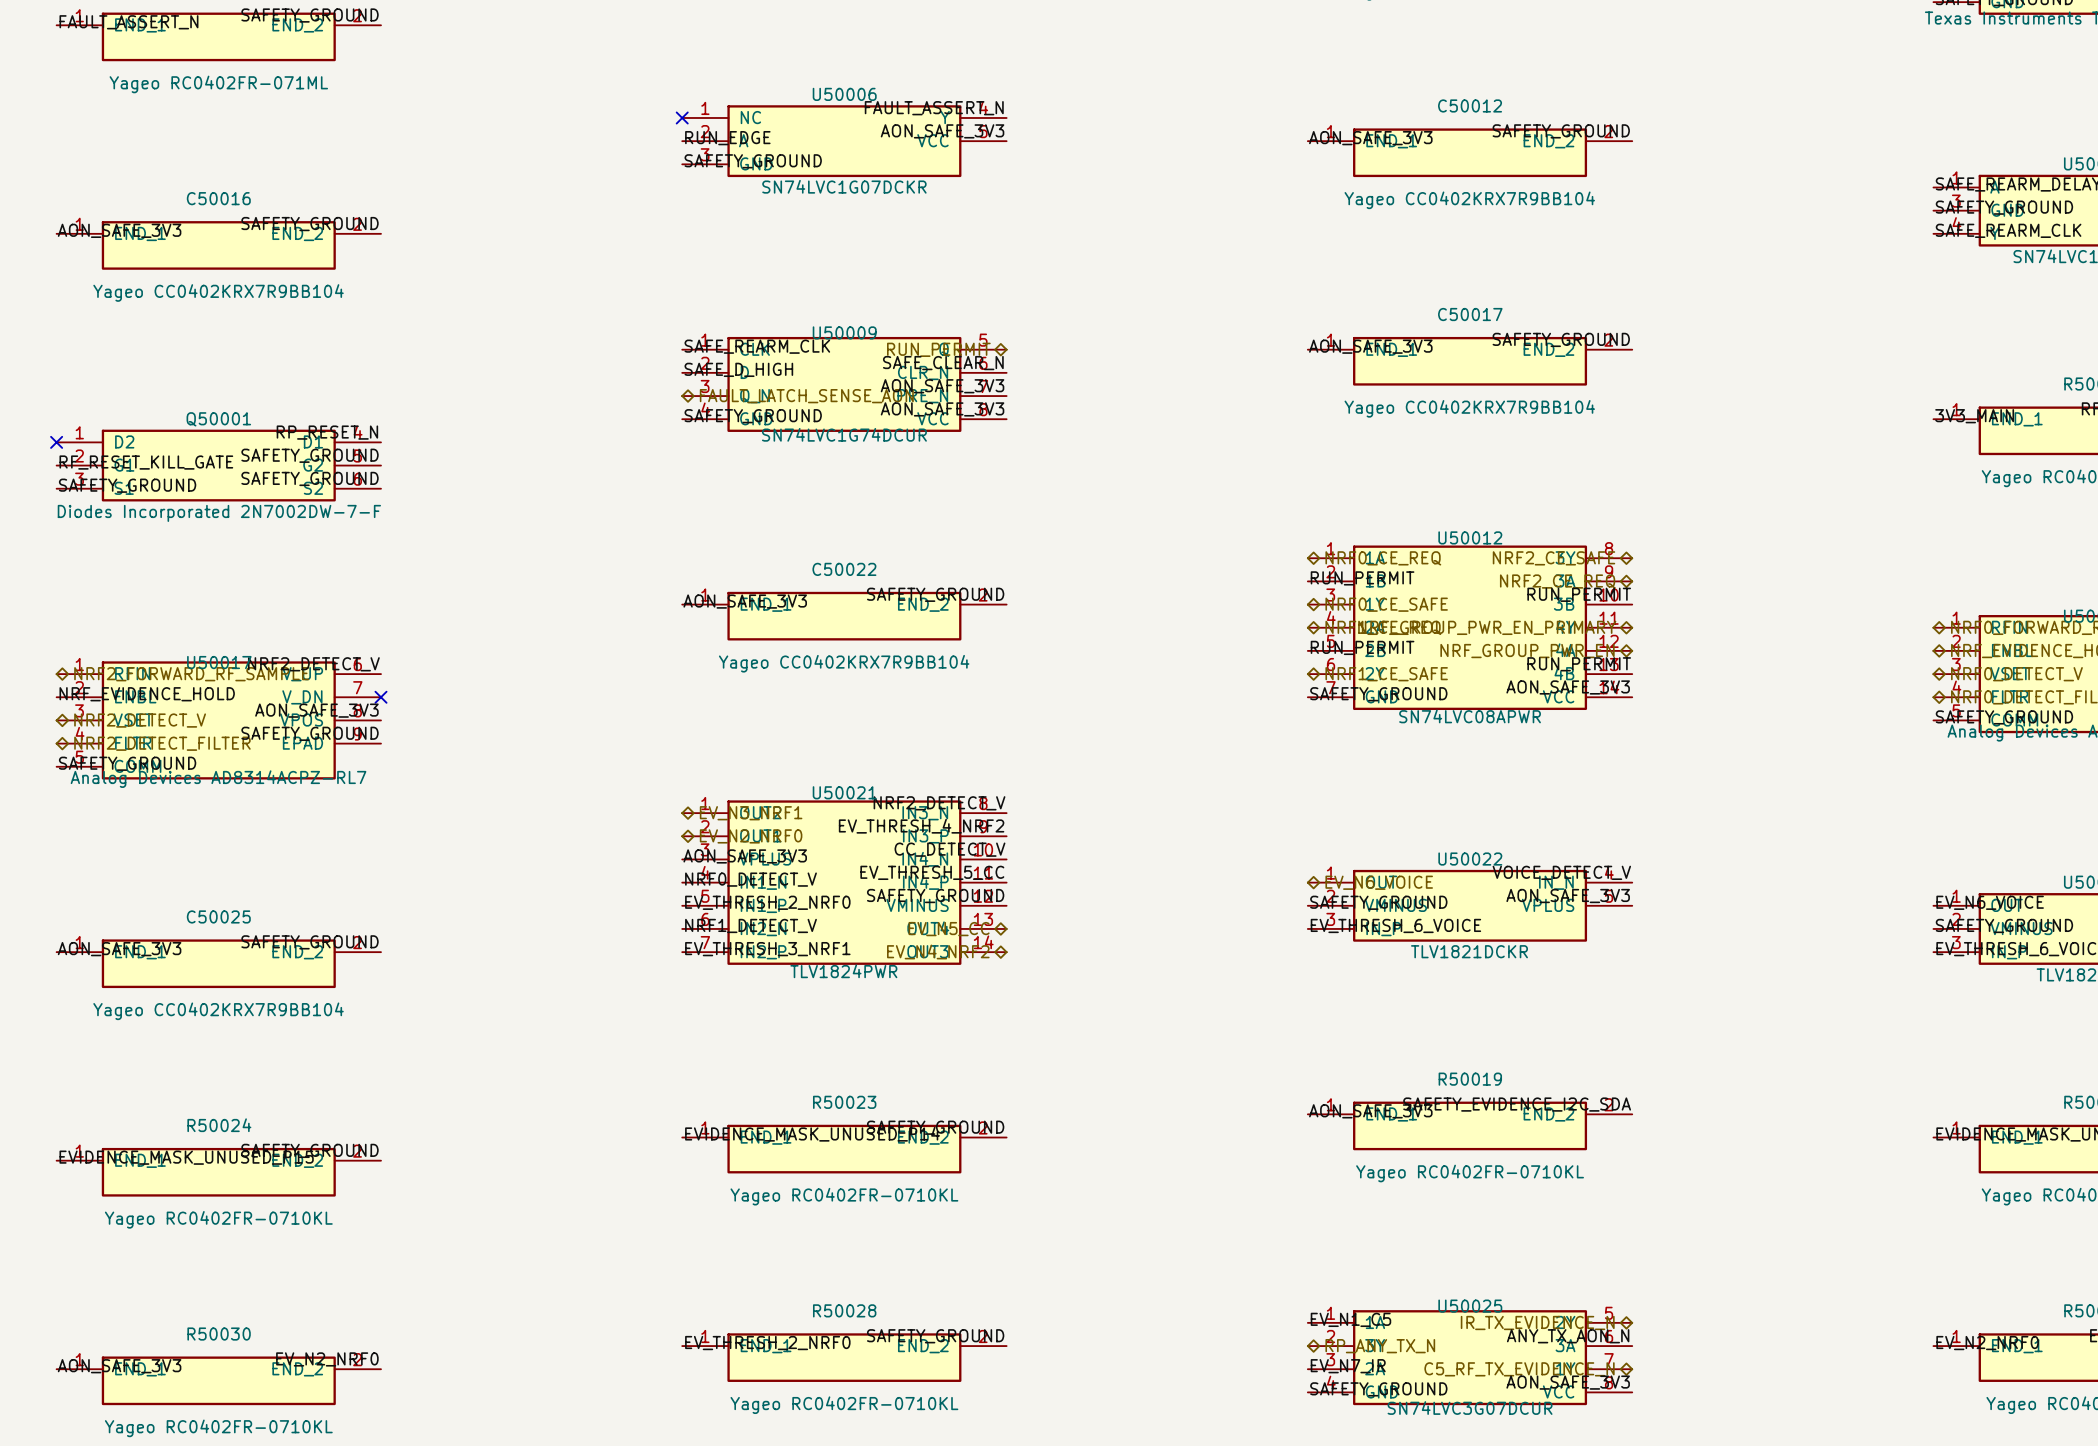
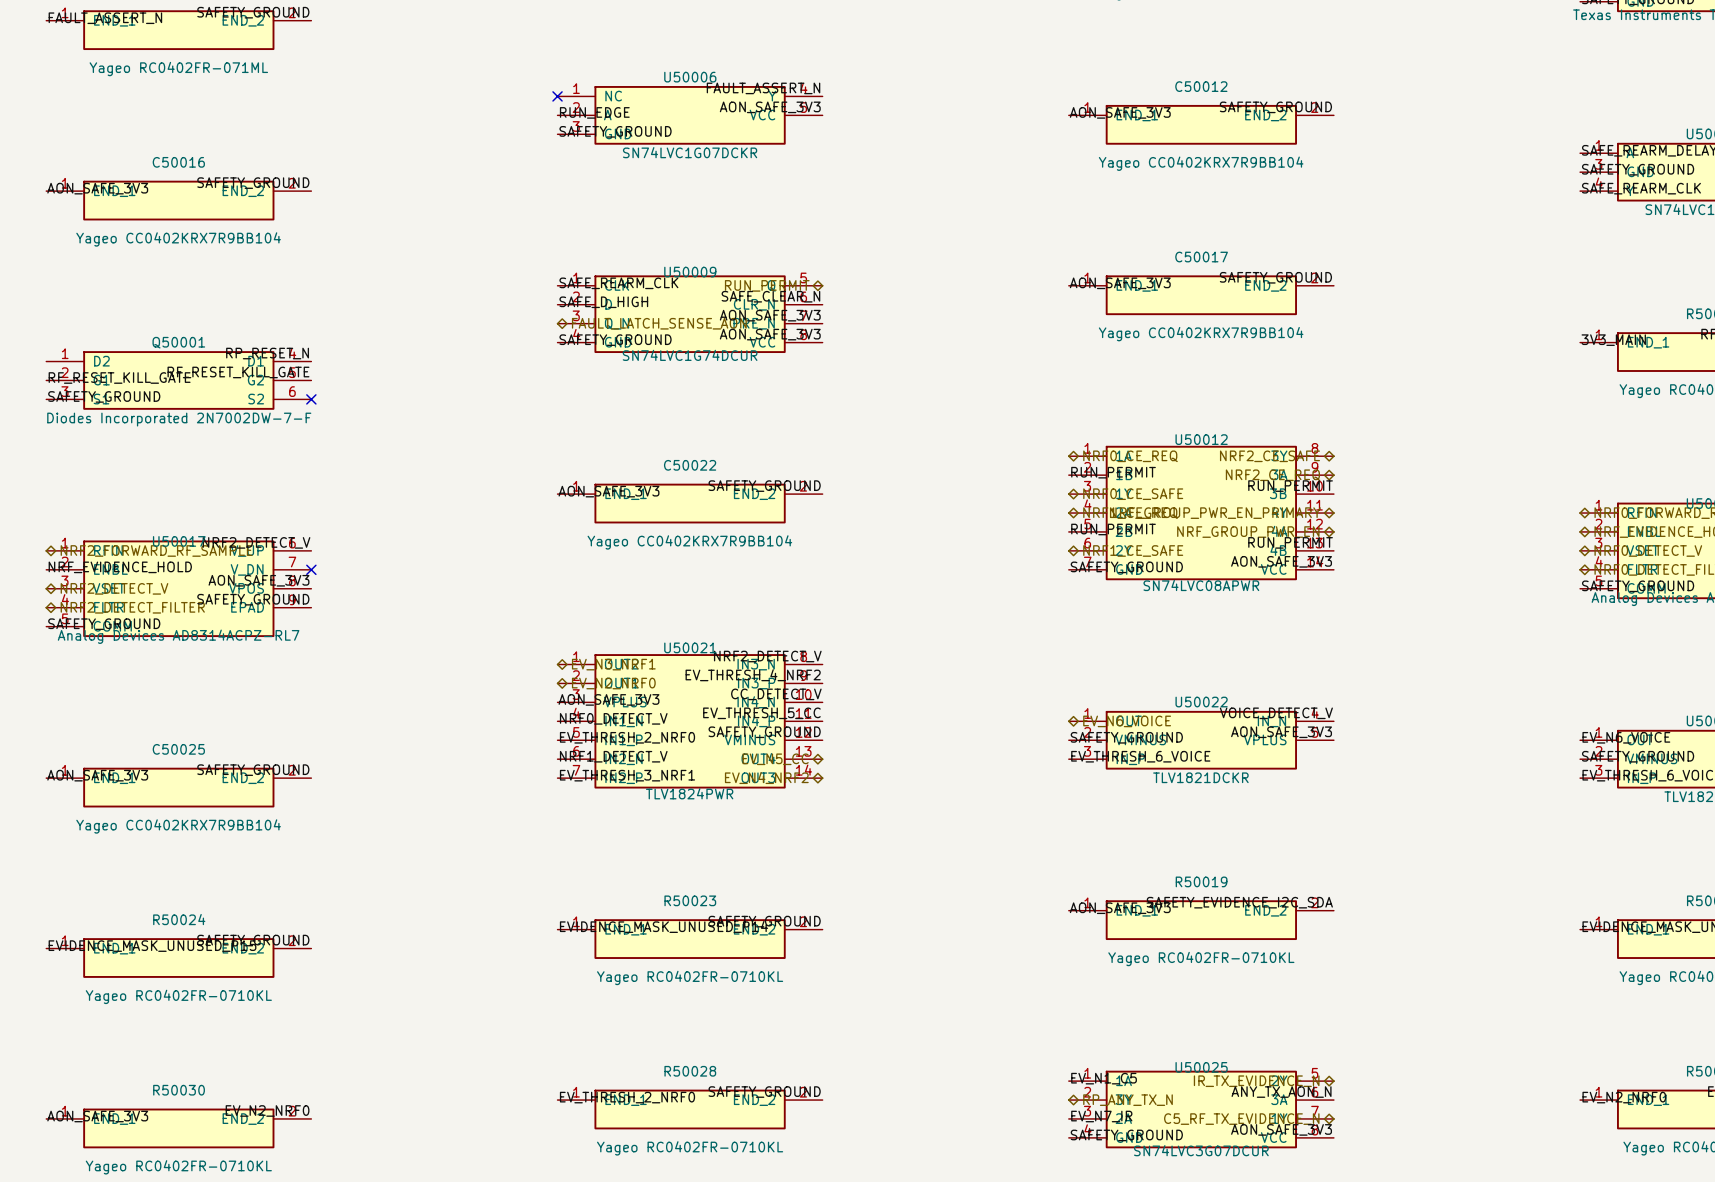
no-connect mark: (56, 442) -> none
label: SAFETY_GROUND (310, 455) -> RF_RESET_KILL_GATE (238, 372)
label: SAFETY_GROUND (310, 478) -> none
no-connect mark: none -> (311, 399)

